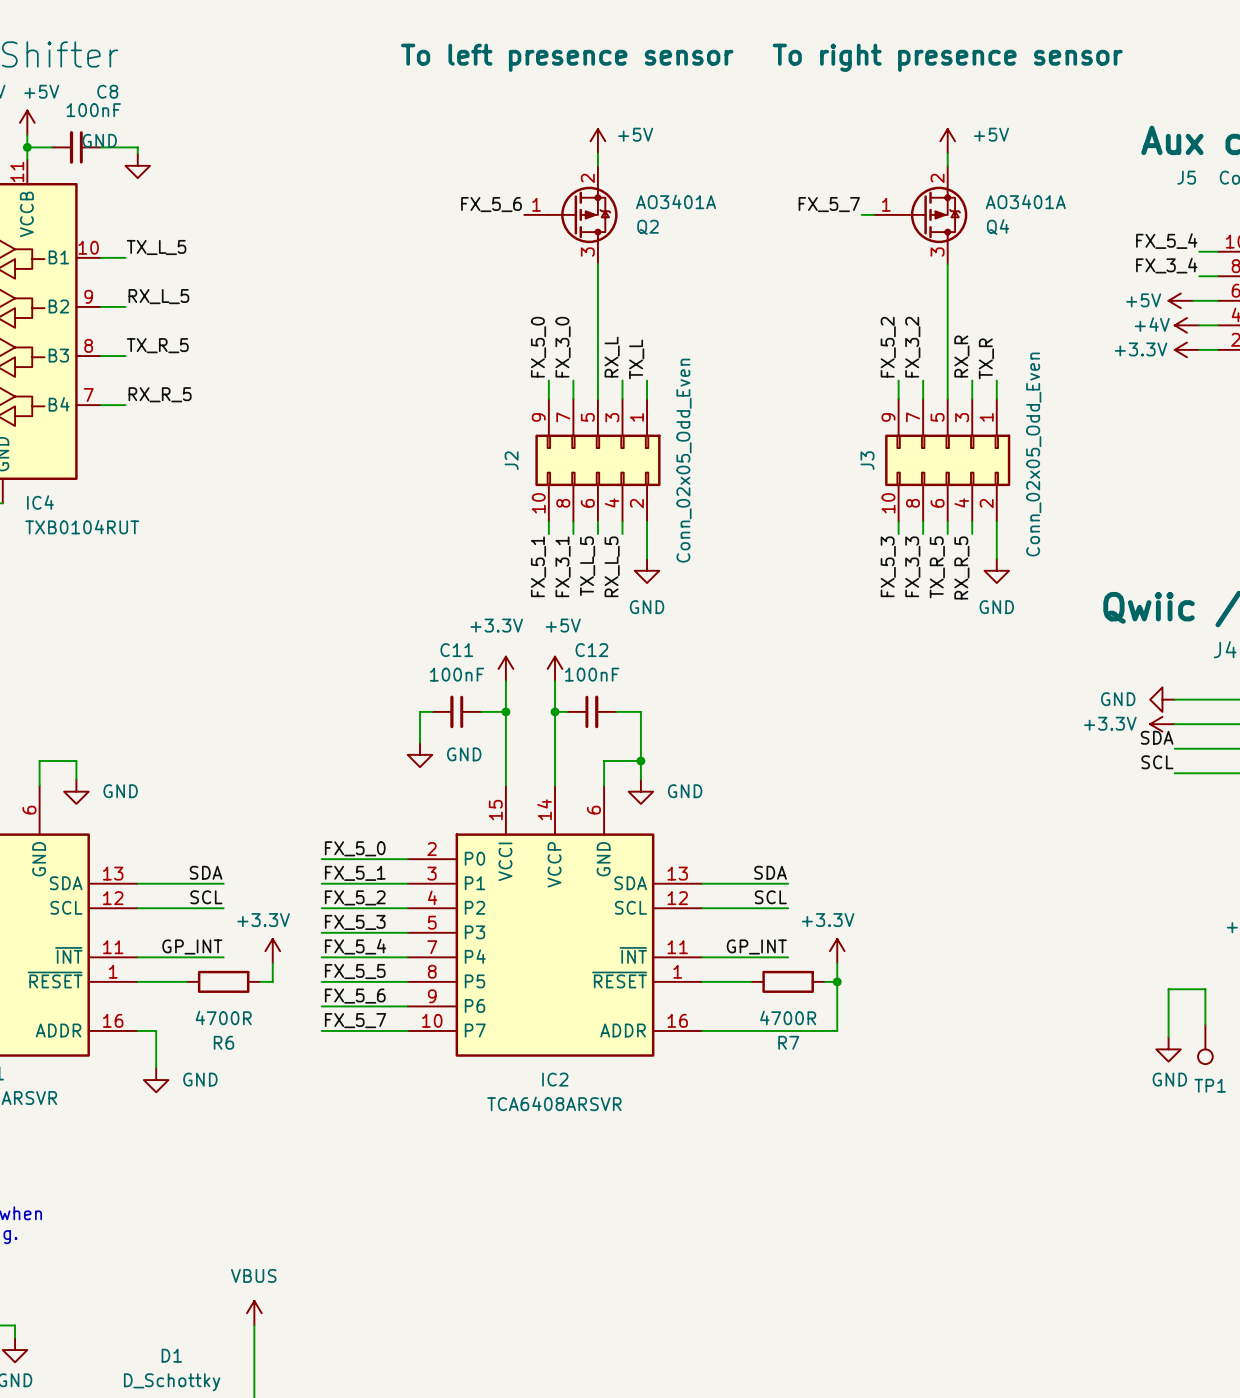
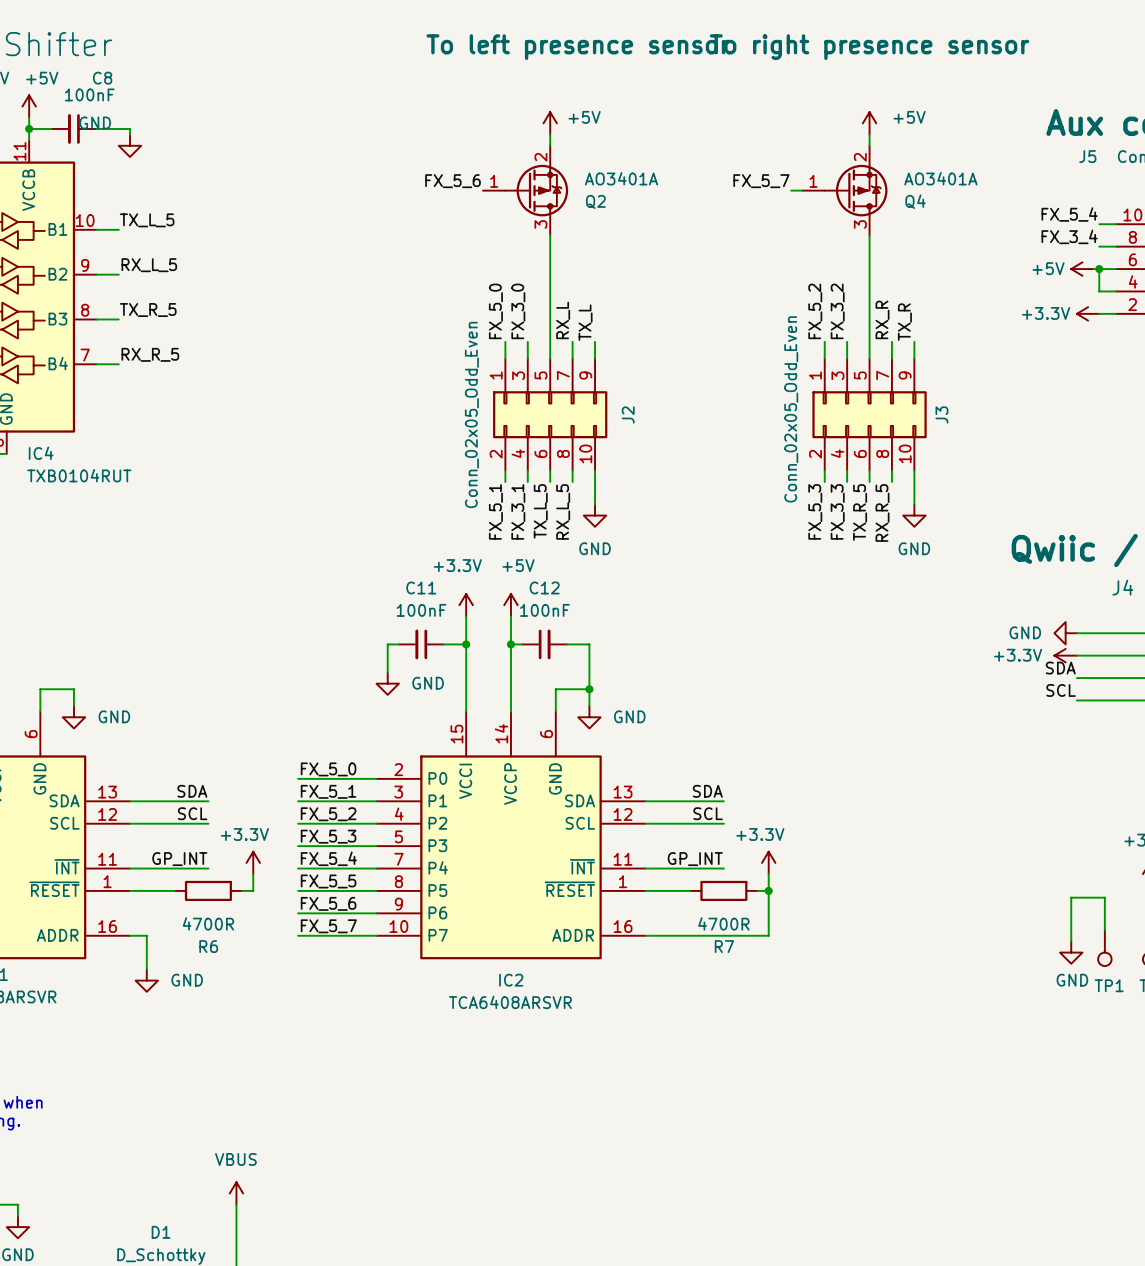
wire: none -> (1099, 269) (1099, 291)
junction: none -> (1099, 269)
power symbol: +4V (1186, 325) -> none
J2 flip: as is (597, 460) -> left-right (550, 414)
J3 flip: as is (947, 460) -> left-right (869, 414)

